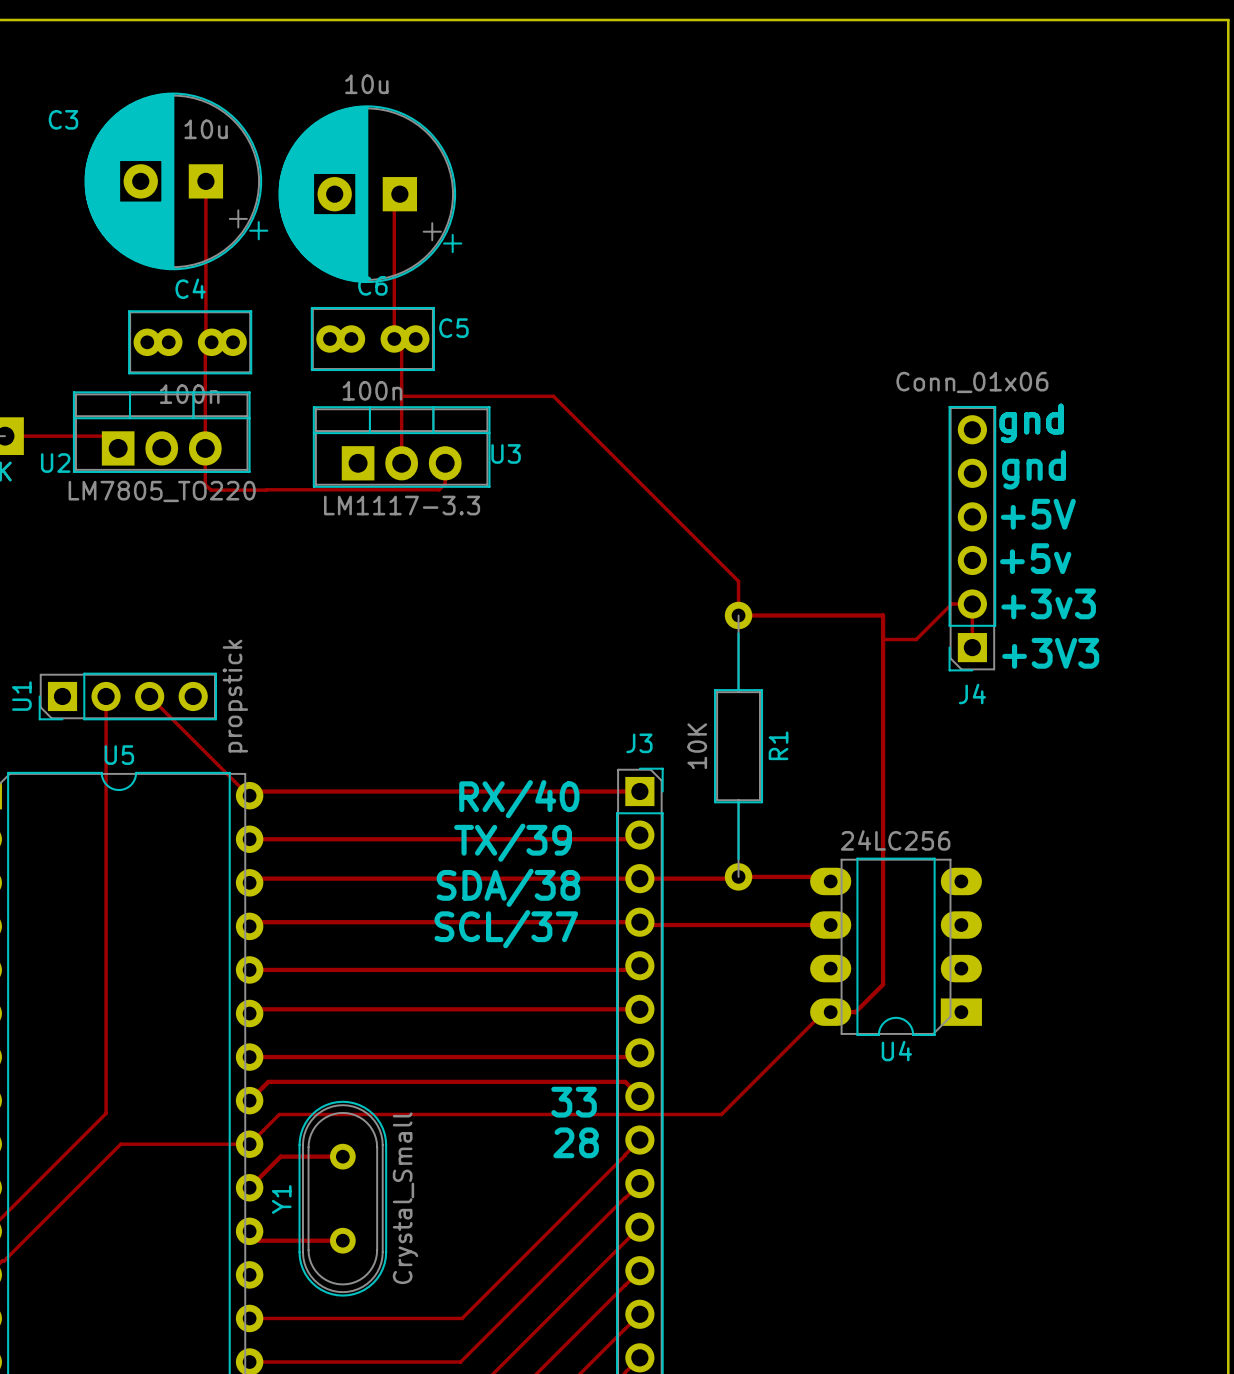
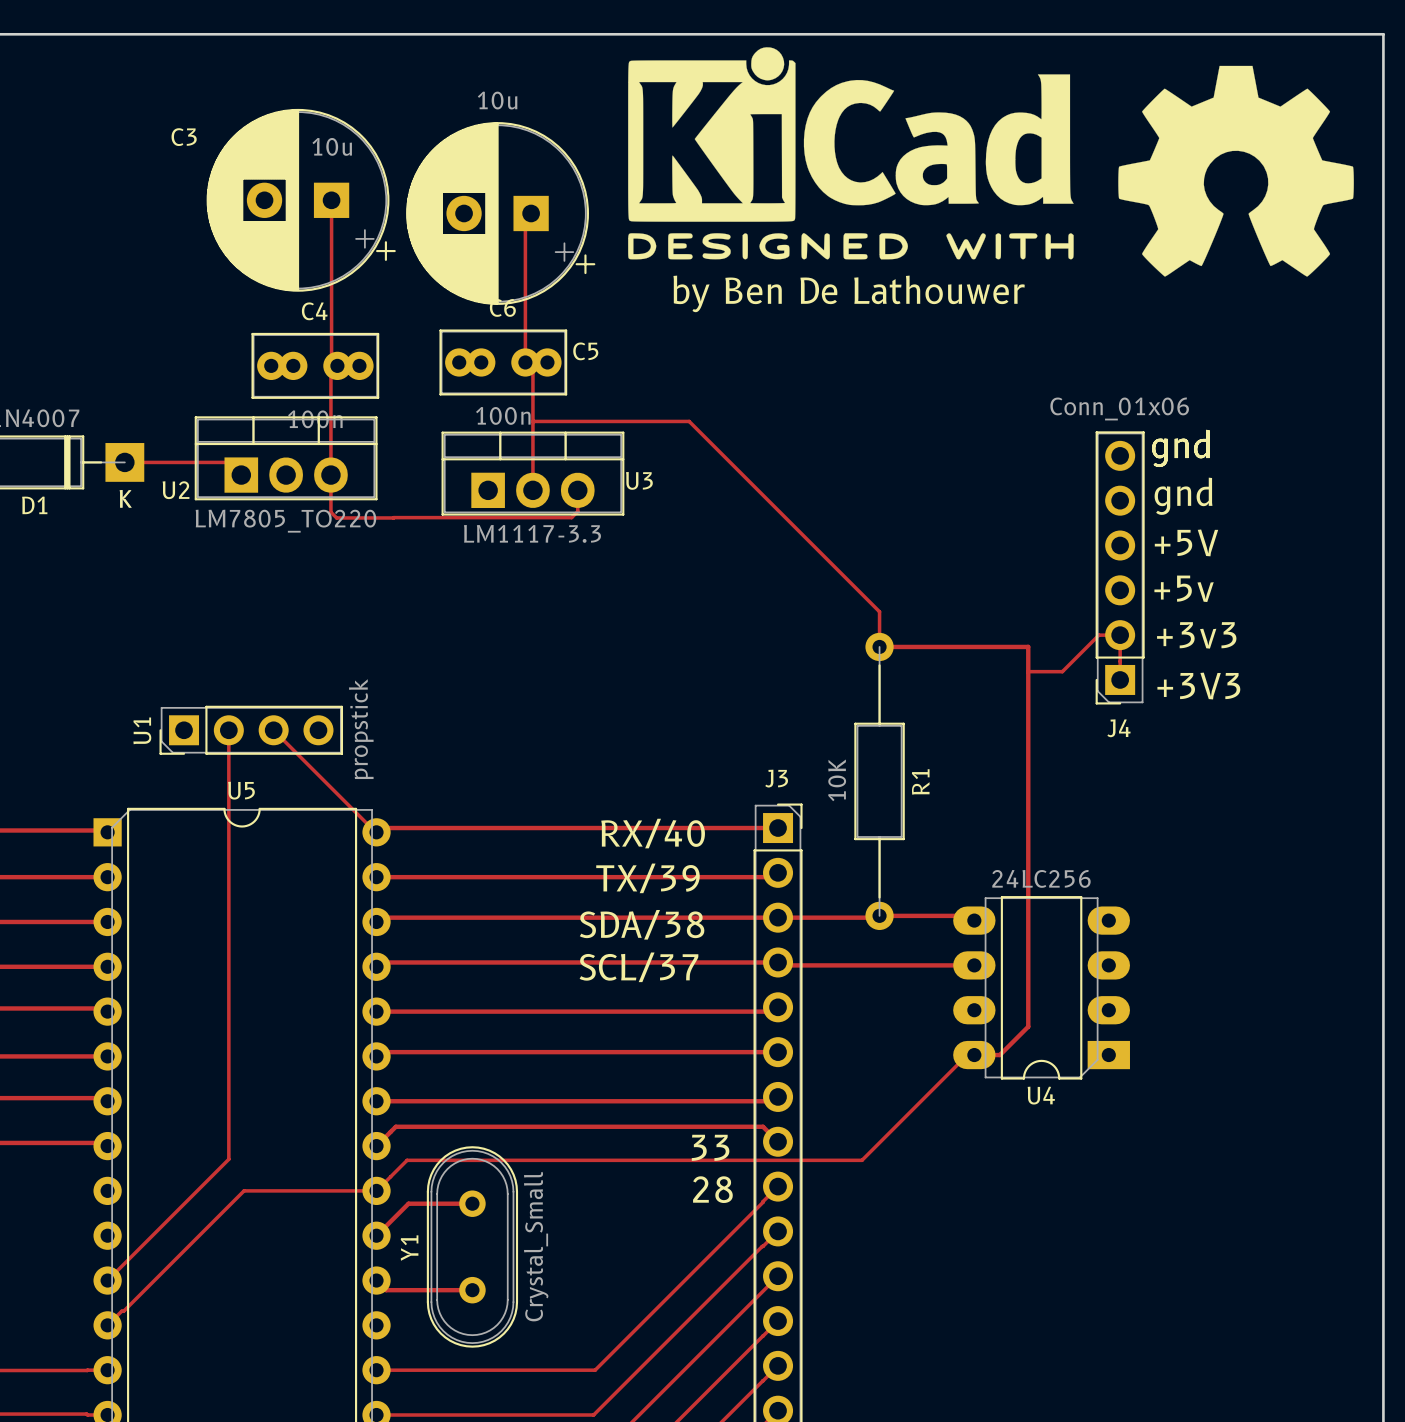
drawing: none -> [628, 47, 1074, 260]
drawing: none -> [1118, 65, 1354, 277]
text: none -> by Ben De Lathouwer (849, 293)

